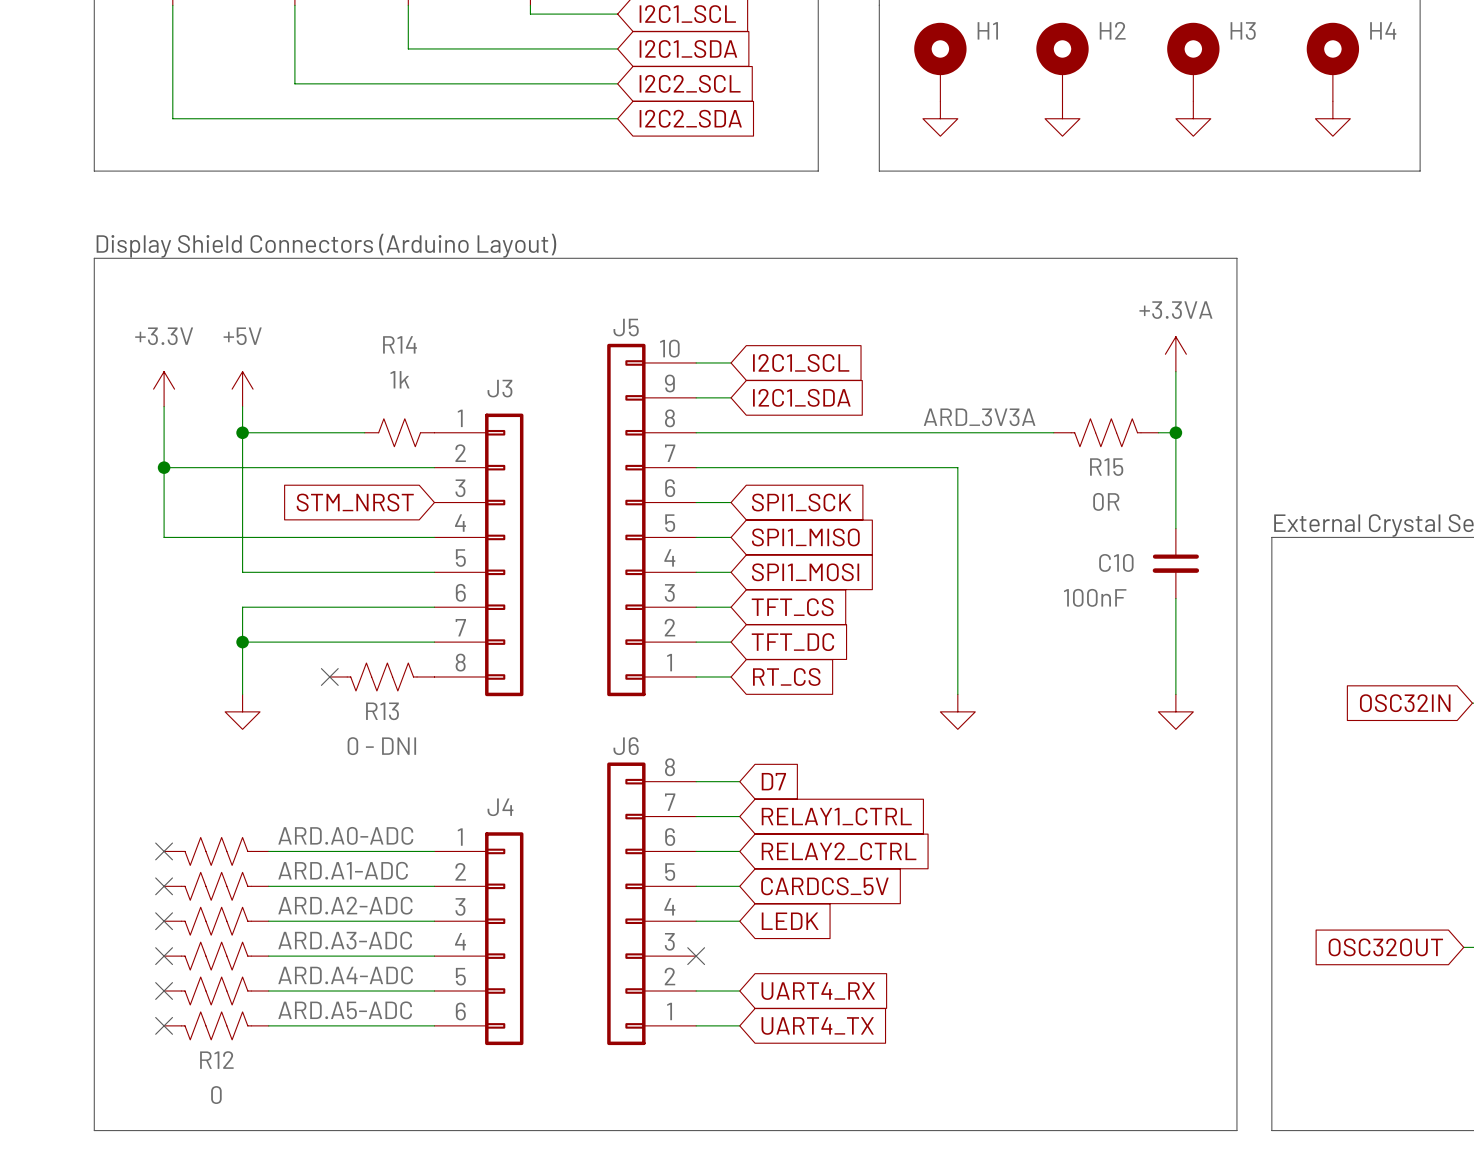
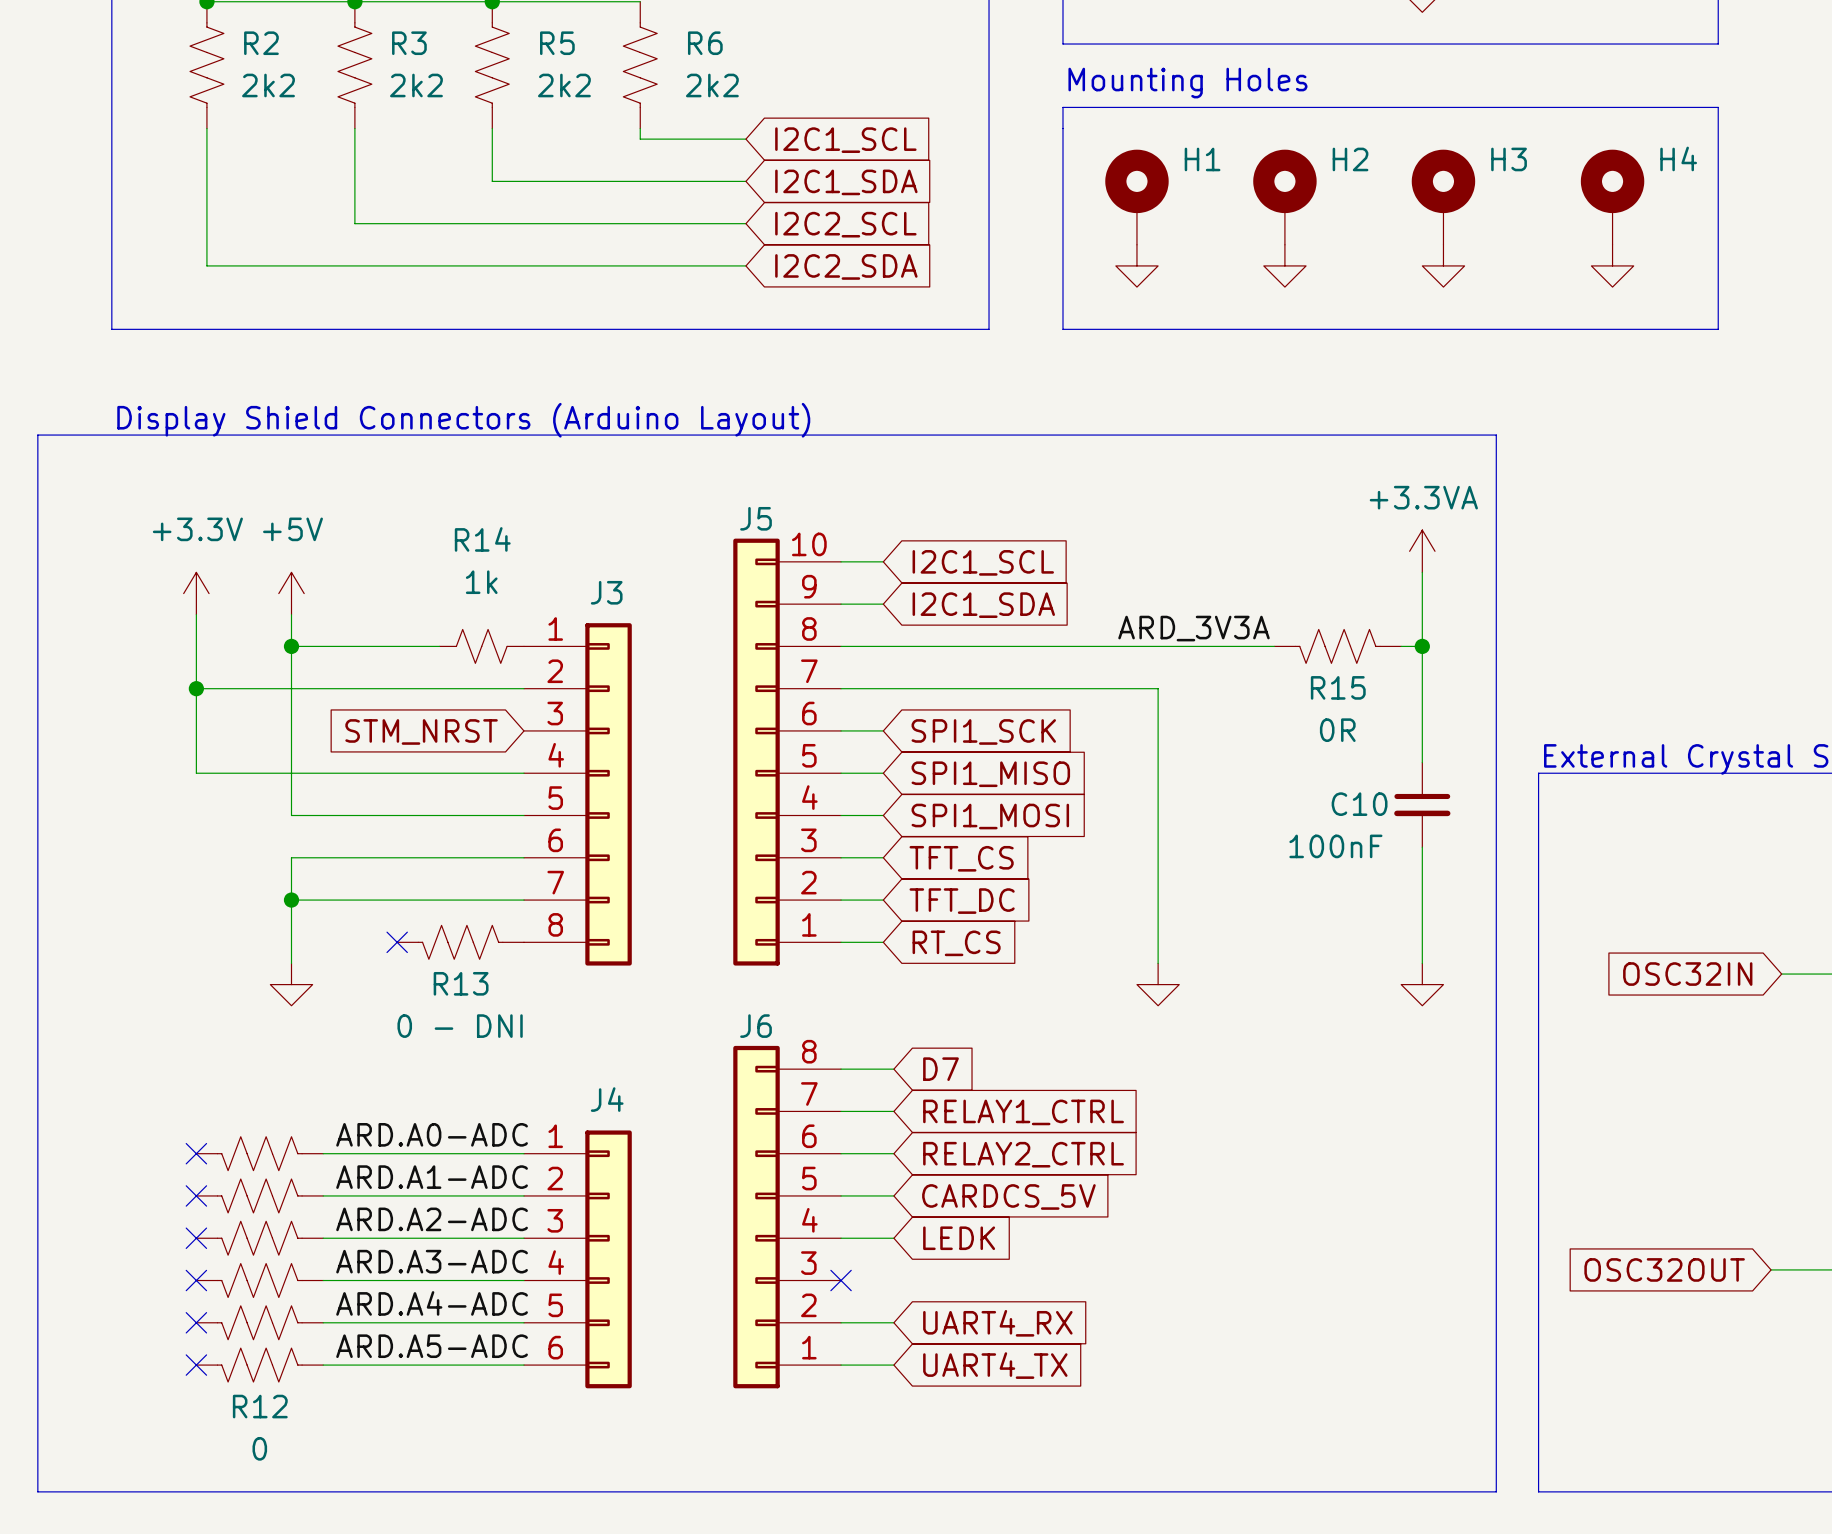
line: (94, 258) (94, 1130) -> (111, 435) (37, 435) (37, 1491) (111, 1491)

